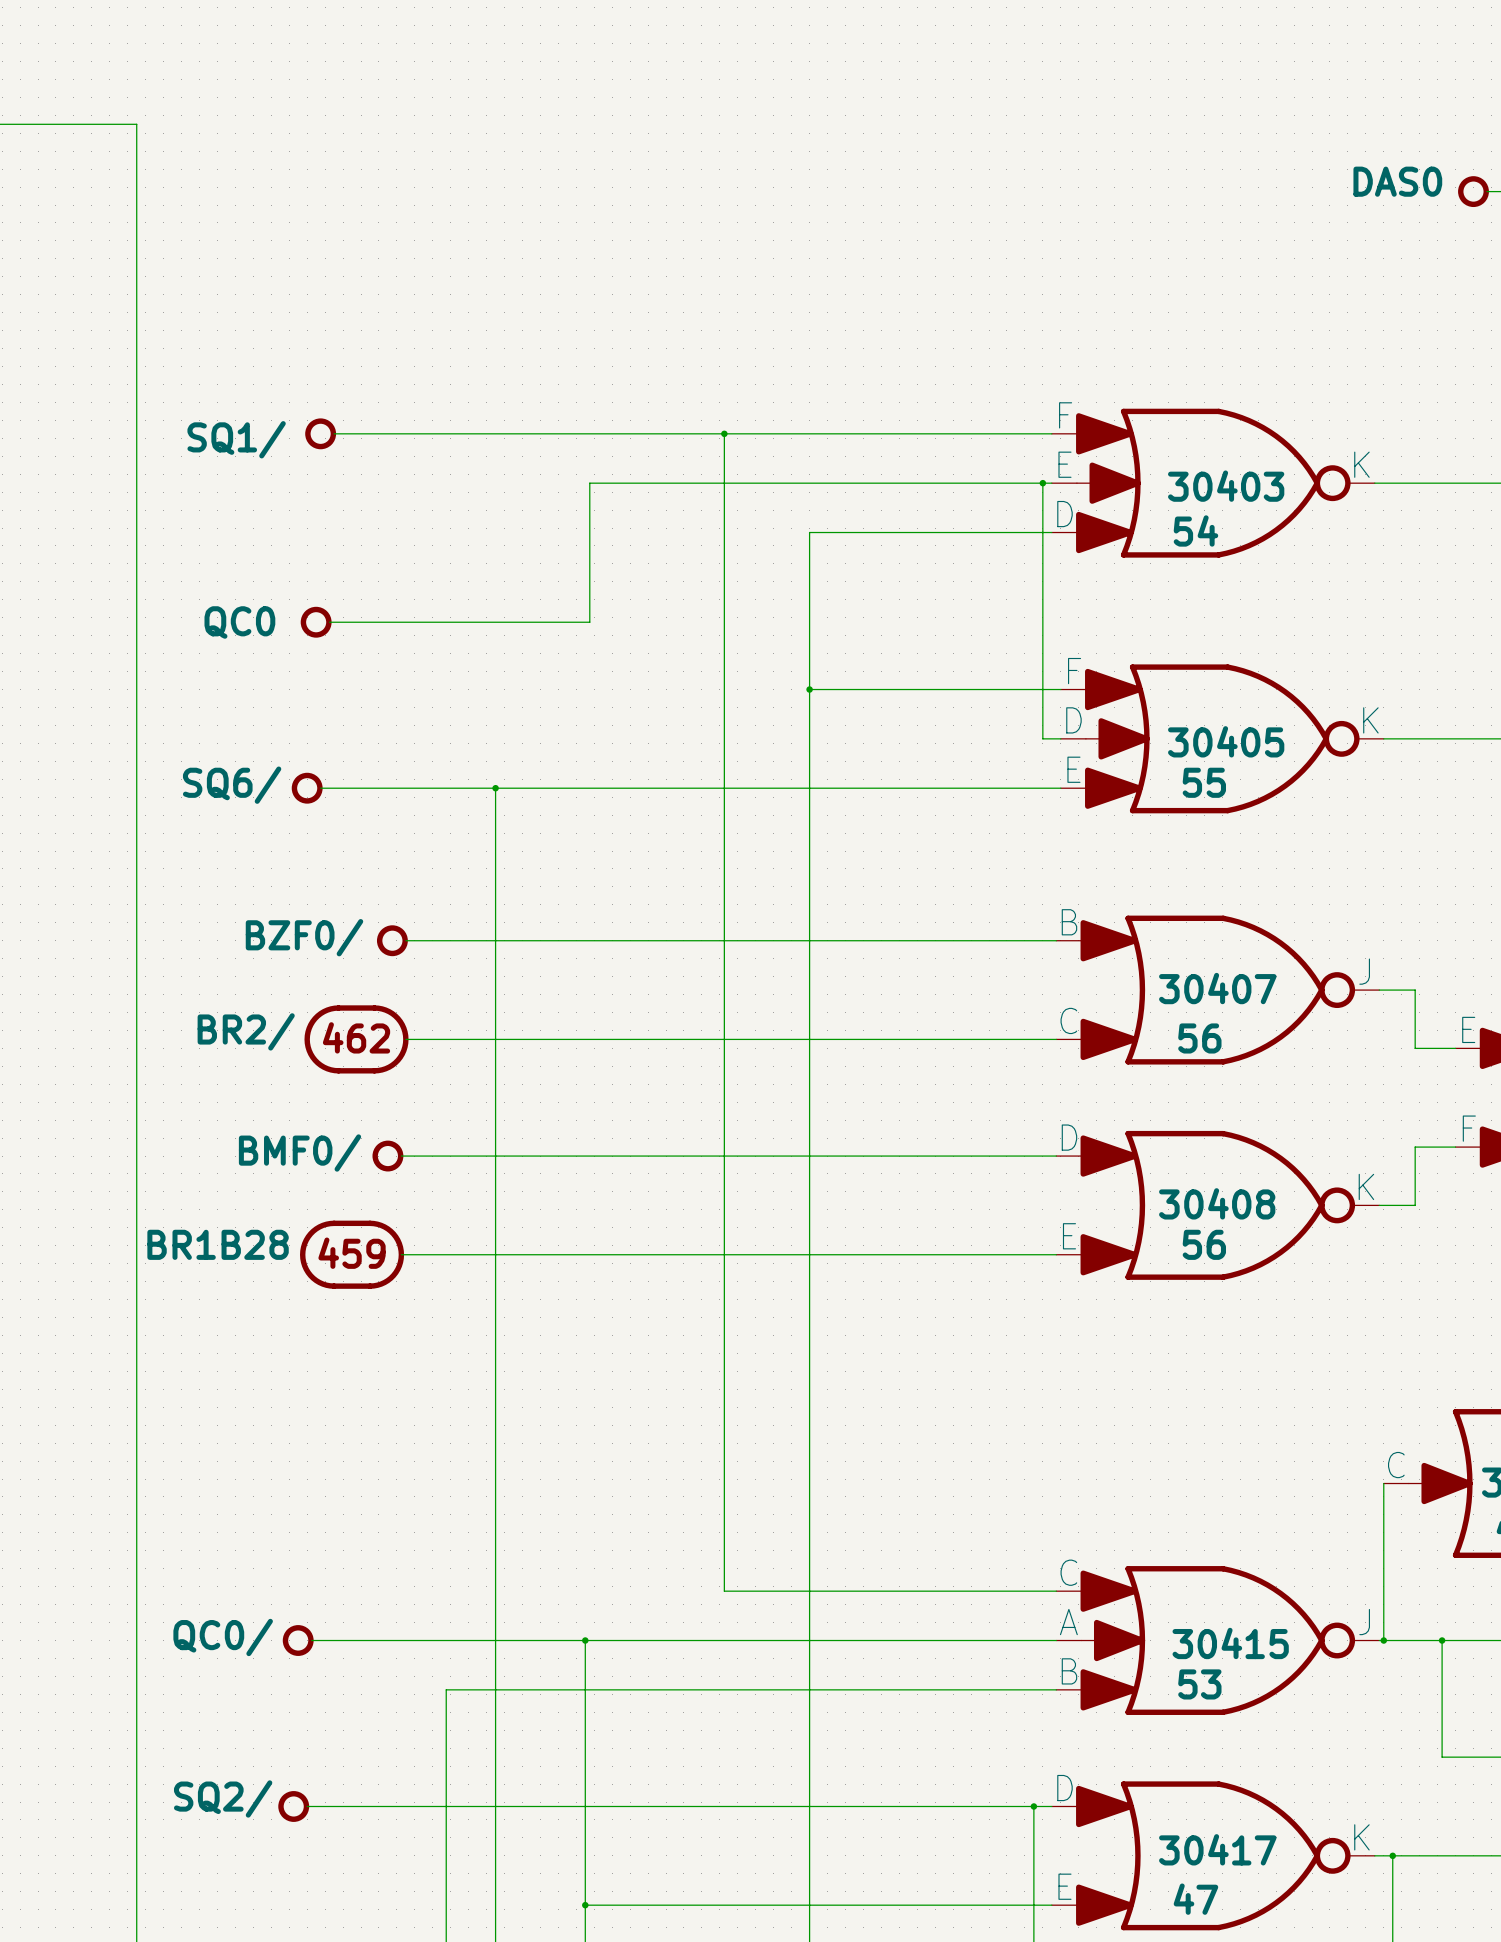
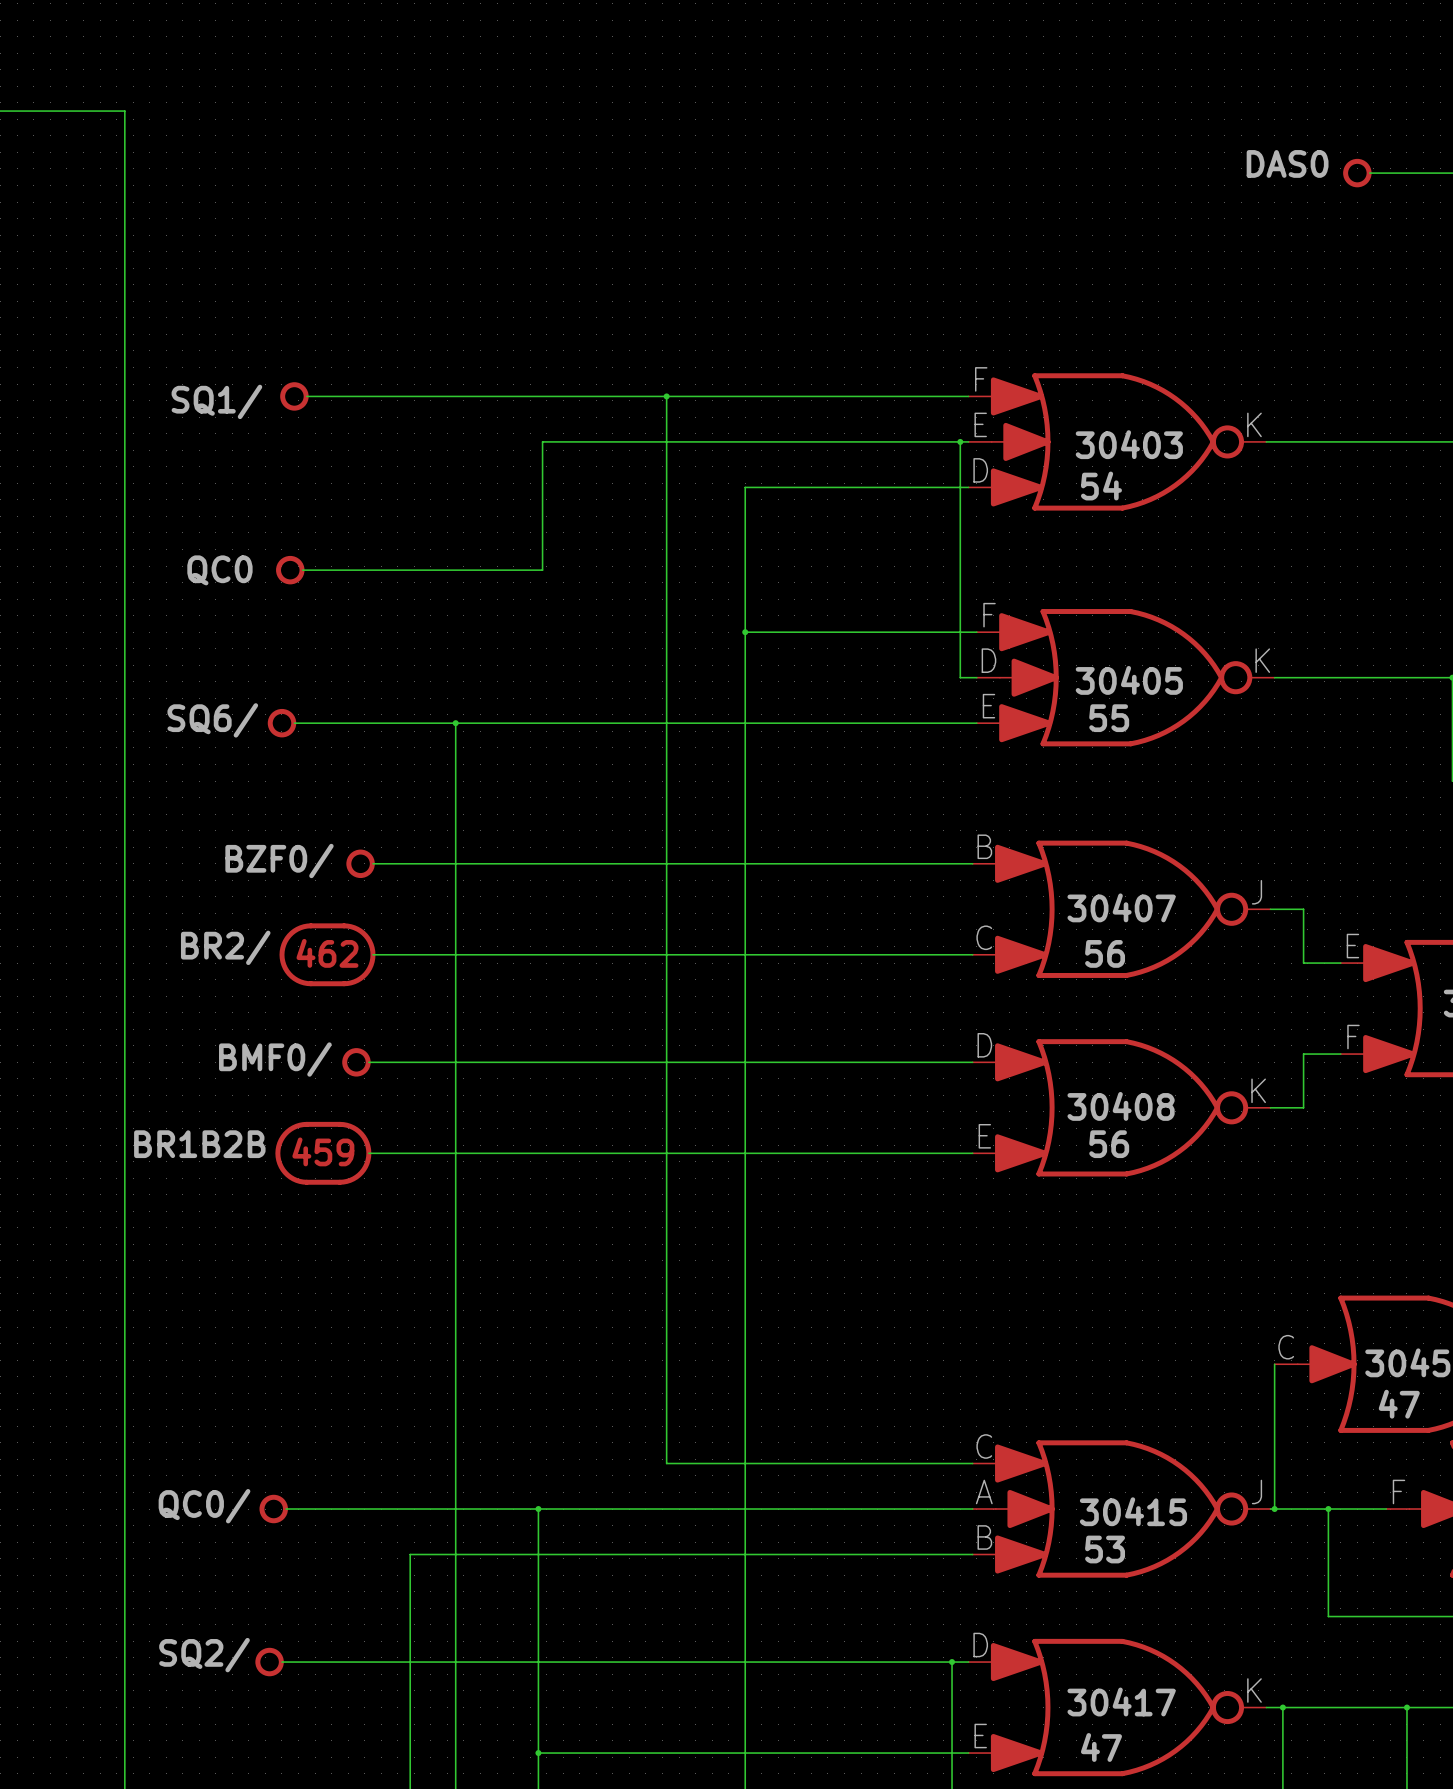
part text: BR1B28 (218, 1244) -> BR1B2B (199, 1144)

